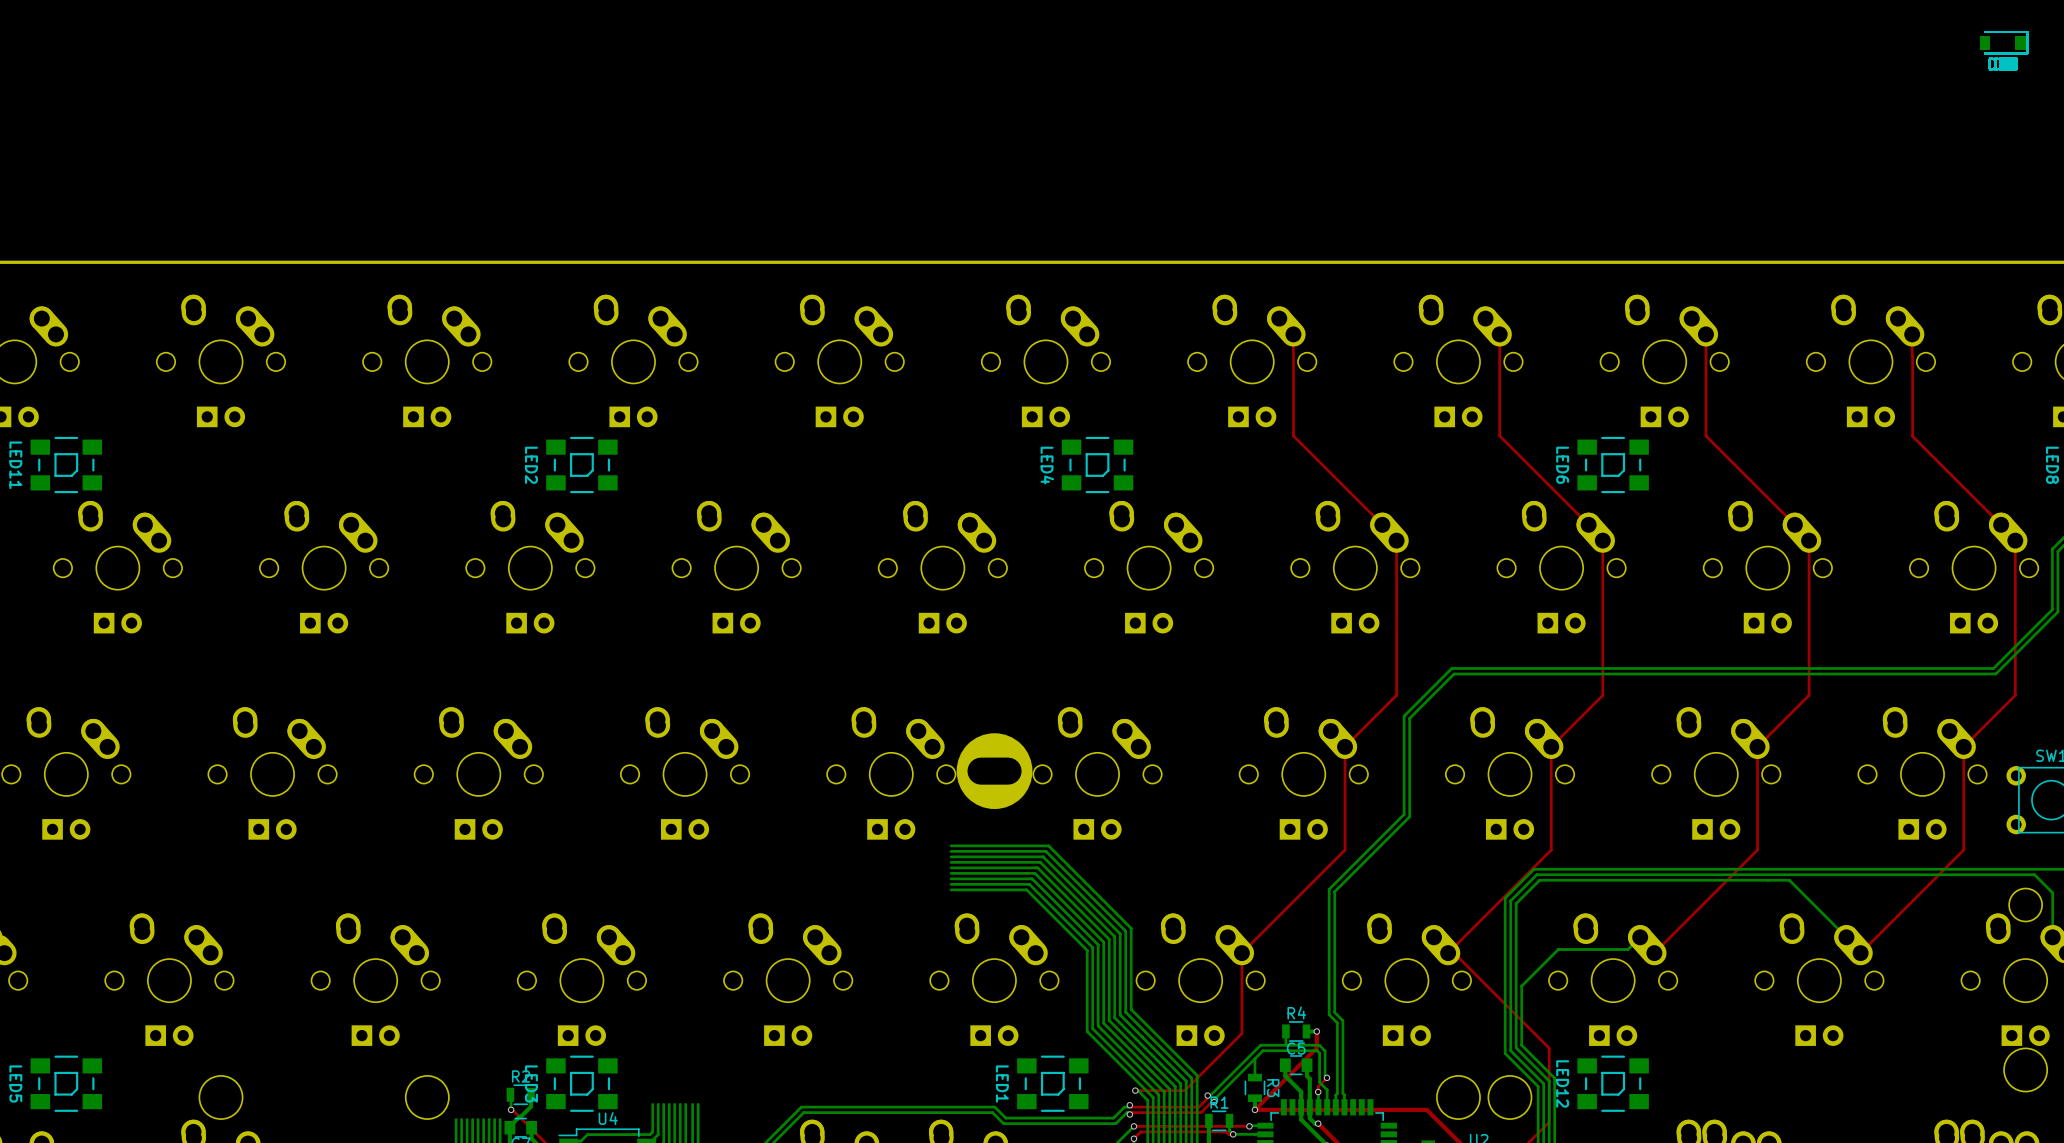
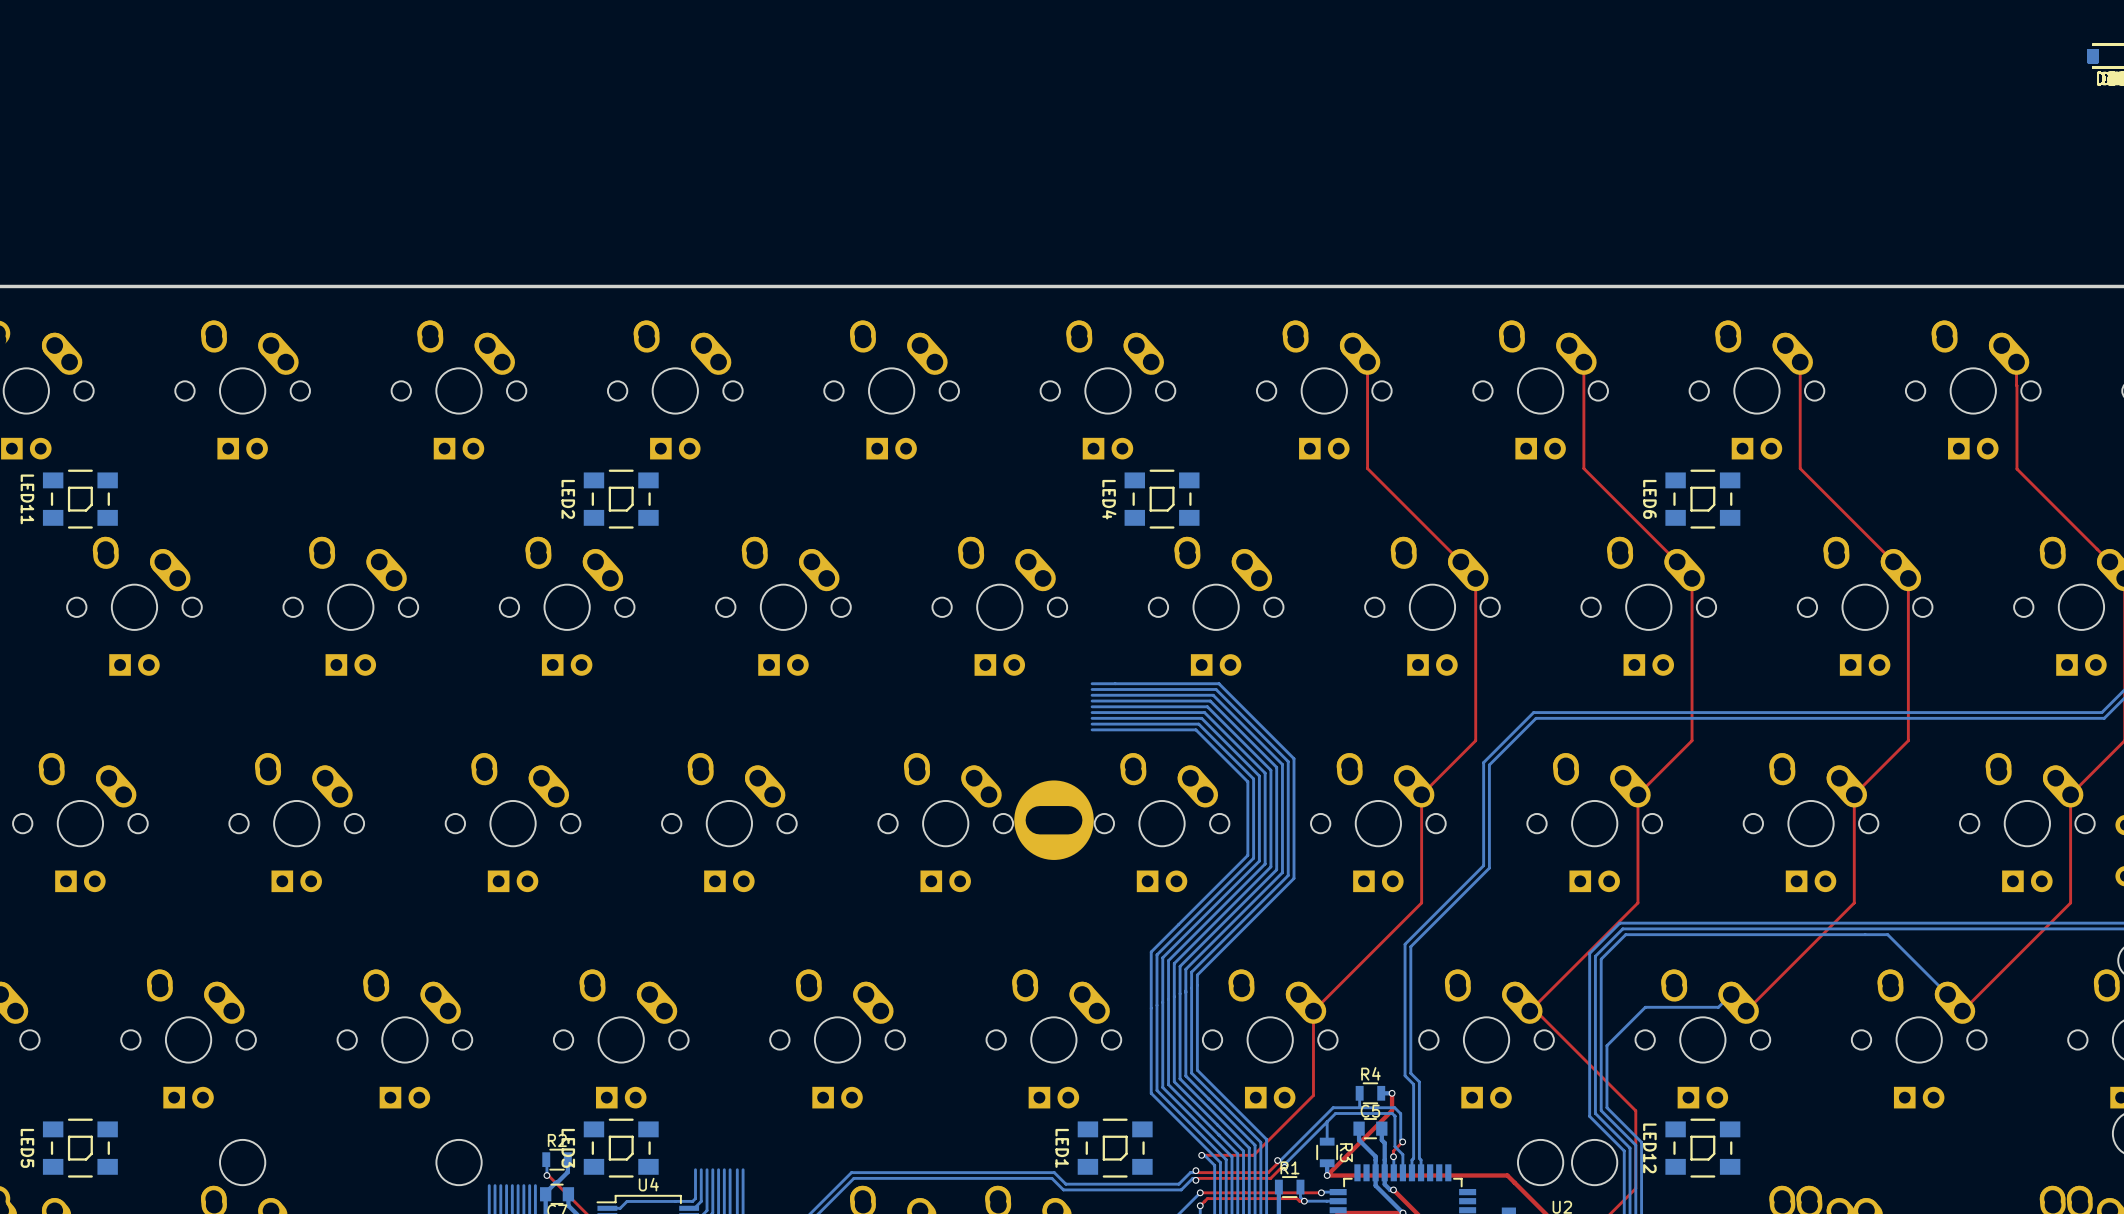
bottom track: (951, 845) (1048, 845) (1131, 928) -> (1092, 683) (1219, 683) (1294, 758) (1294, 878) (1197, 975) (1197, 985)
bottom track: (951, 851) (1045, 851) (1125, 931) -> (1092, 689) (1216, 689) (1288, 761) (1288, 875) (1191, 972) (1191, 988)
bottom track: (951, 856) (1043, 856) (1120, 933) -> (1092, 695) (1213, 695) (1282, 764) (1282, 872) (1185, 969) (1185, 990)
bottom track: (951, 862) (1040, 862) (1114, 936) -> (1092, 701) (1210, 701) (1276, 767) (1276, 869) (1180, 966) (1180, 993)
bottom track: (951, 867) (1037, 867) (1109, 939) -> (1092, 706) (1207, 706) (1270, 770) (1270, 866) (1174, 963) (1174, 996)
bottom track: (951, 873) (1034, 873) (1103, 942) -> (1092, 712) (1204, 712) (1265, 773) (1265, 864) (1168, 960) (1168, 999)
bottom track: (951, 878) (1032, 878) (1098, 944) -> (1092, 718) (1201, 718) (1259, 776) (1259, 861) (1162, 957) (1162, 1002)
bottom track: (951, 884) (1029, 884) (1092, 947) -> (1092, 724) (1198, 724) (1253, 778) (1253, 858) (1156, 954) (1156, 1005)
bottom track: (951, 889) (1026, 889) (1087, 950) -> (1092, 729) (1195, 729) (1247, 781) (1247, 855) (1151, 951) (1151, 1008)

